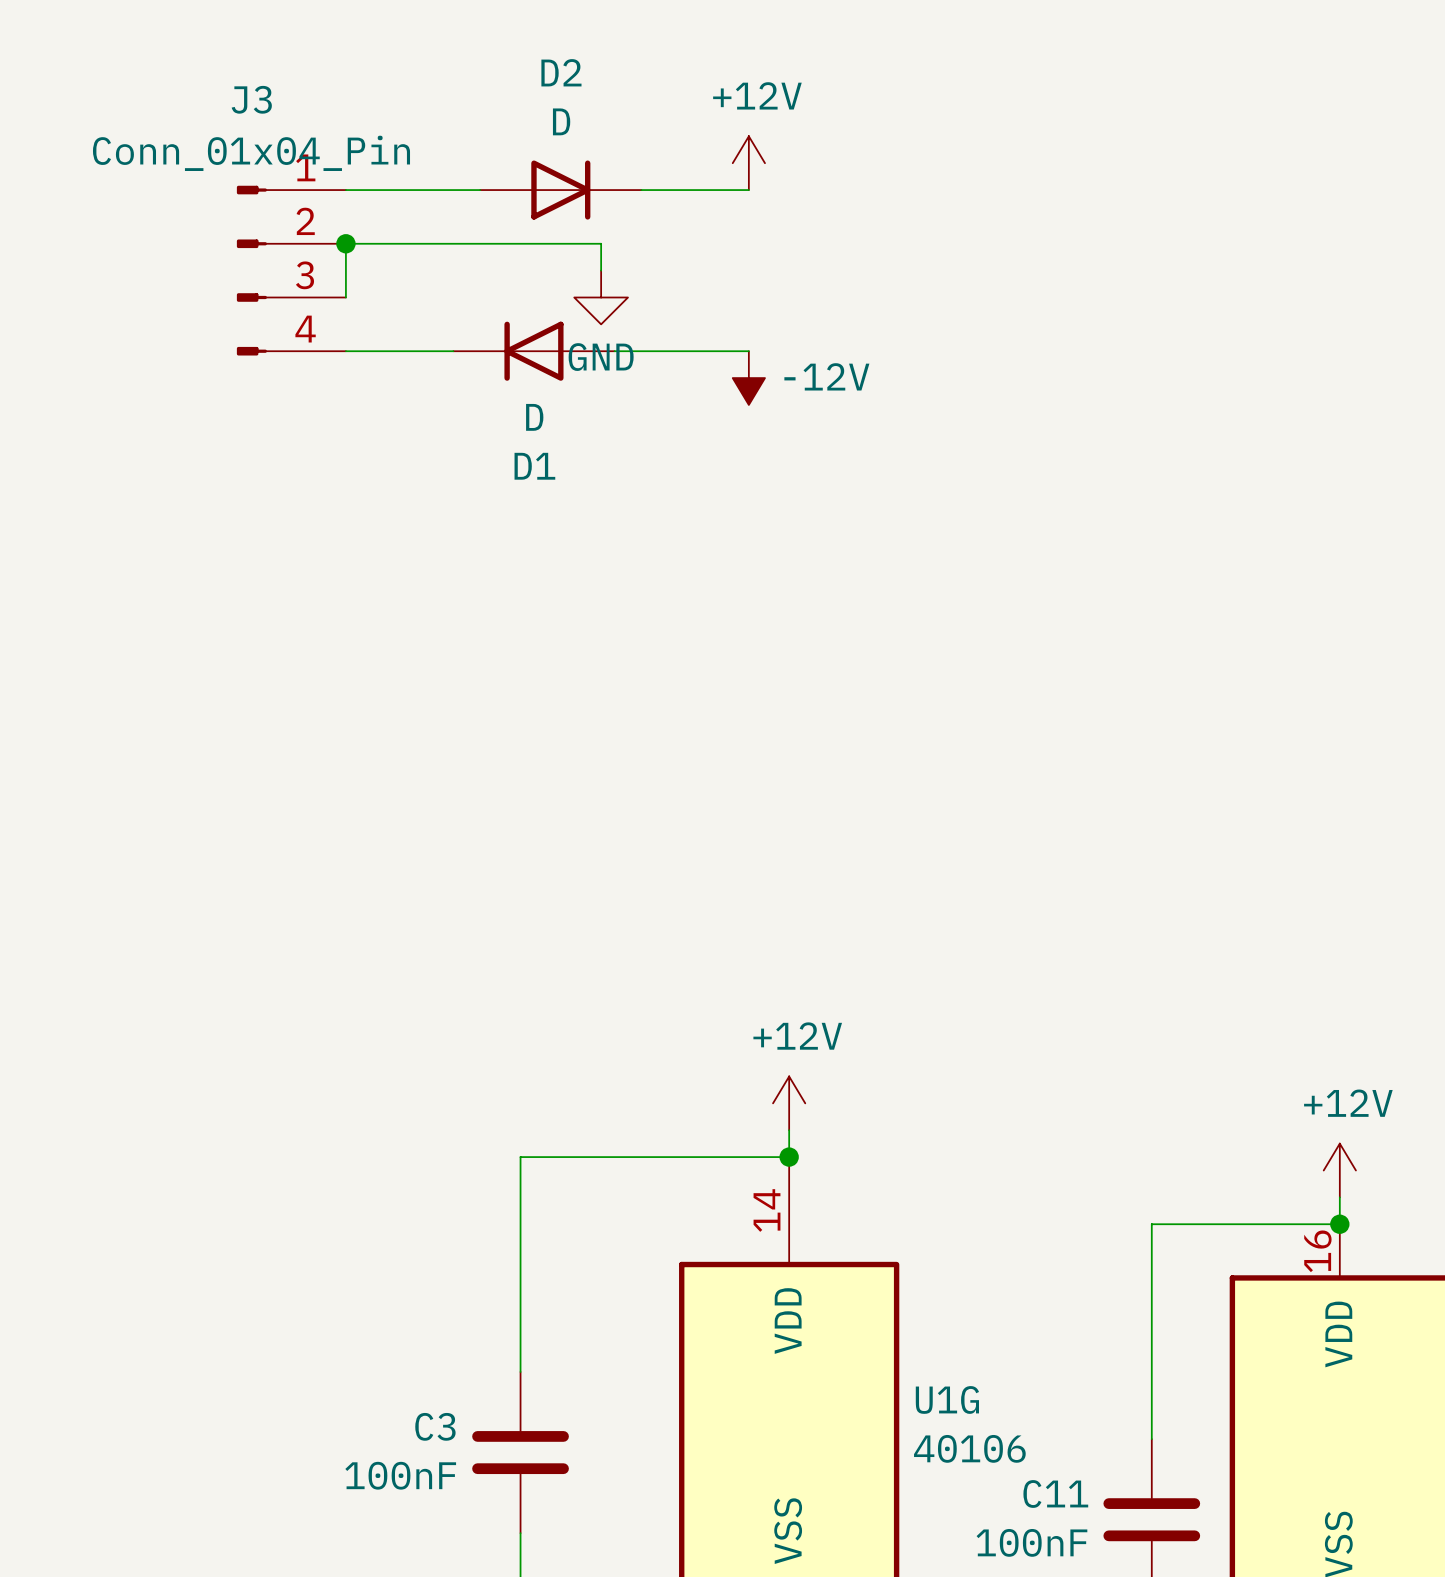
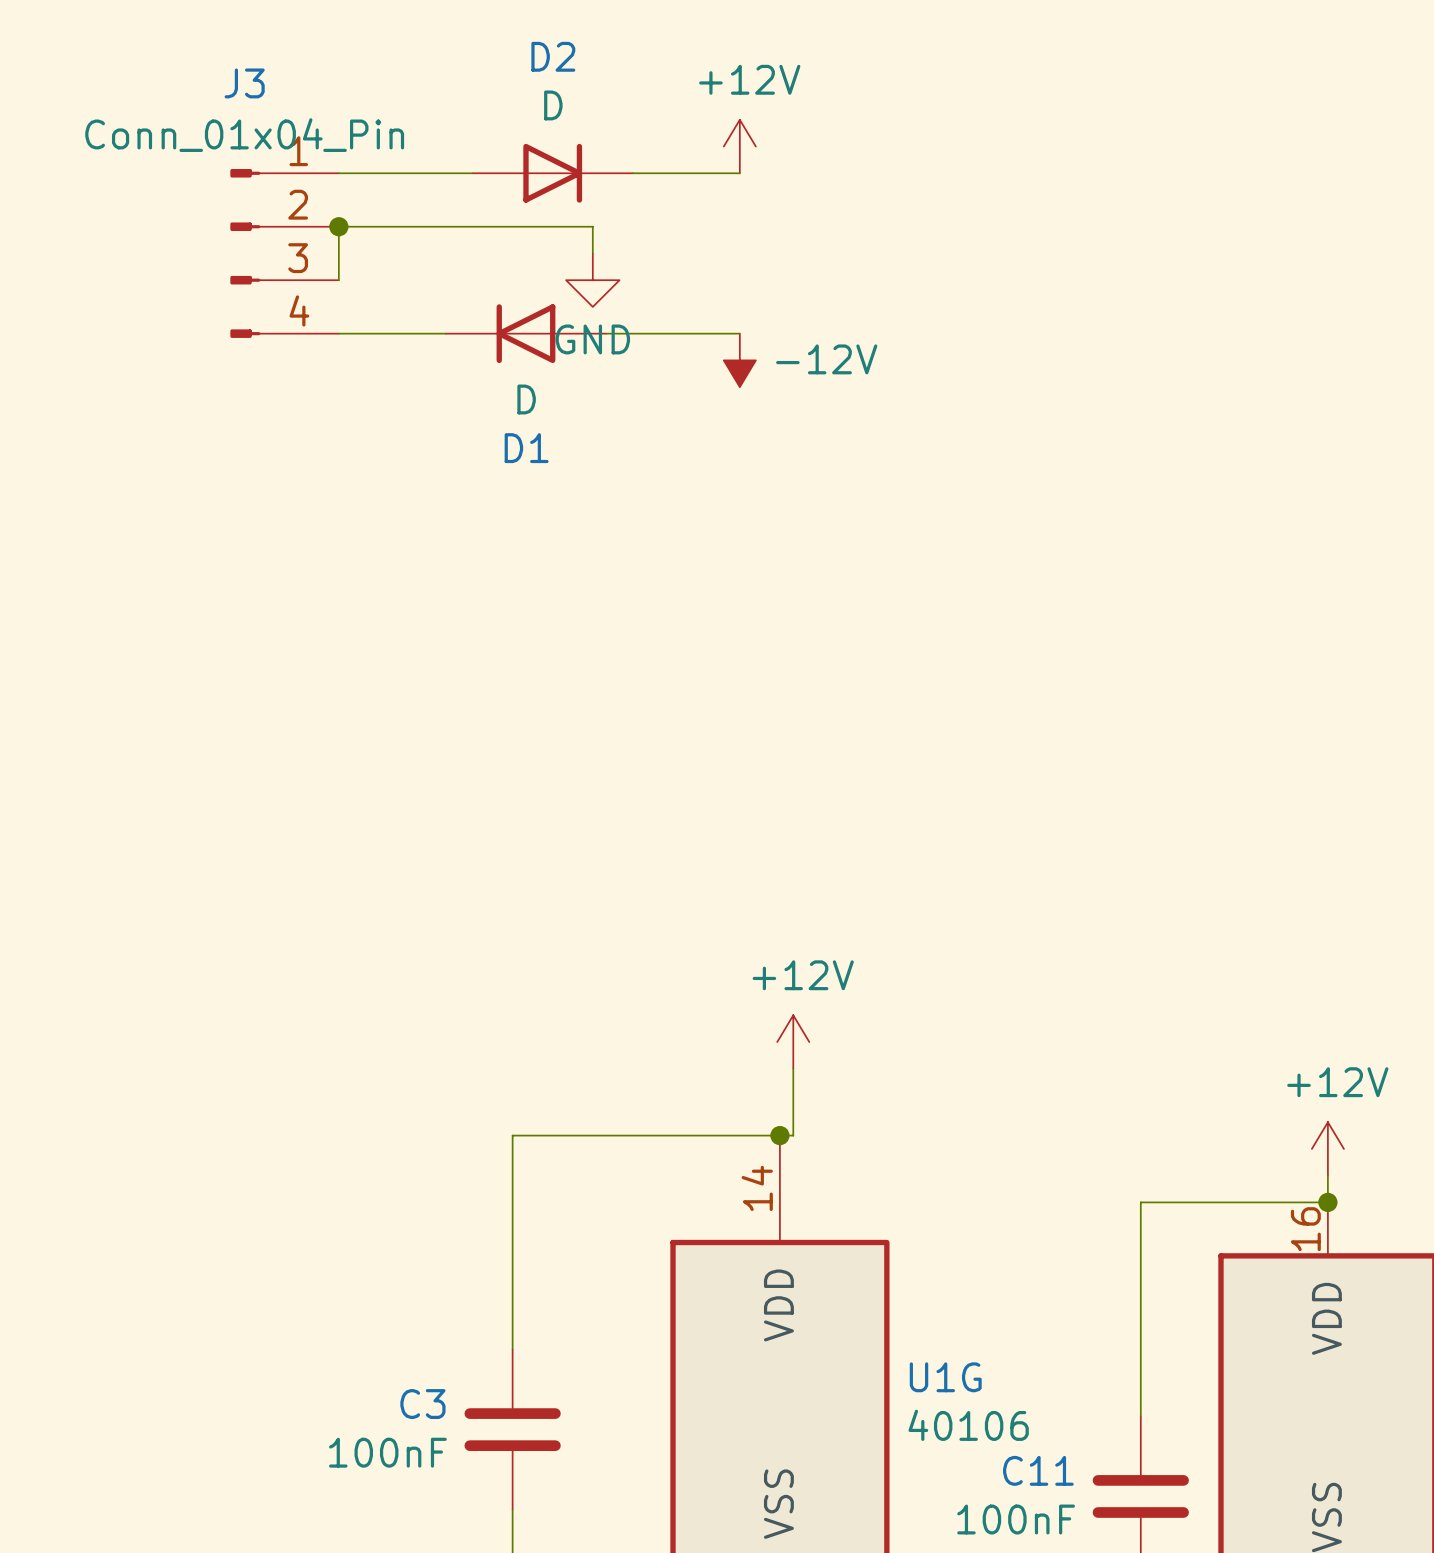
power symbol position: +12V (789, 1103) -> +12V (793, 1042)
wire: (789, 1130) (789, 1157) -> (793, 1068) (793, 1135) (779, 1135)

